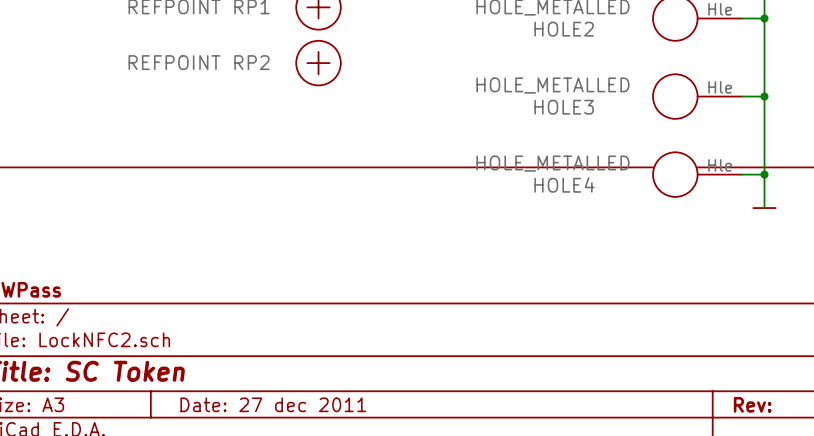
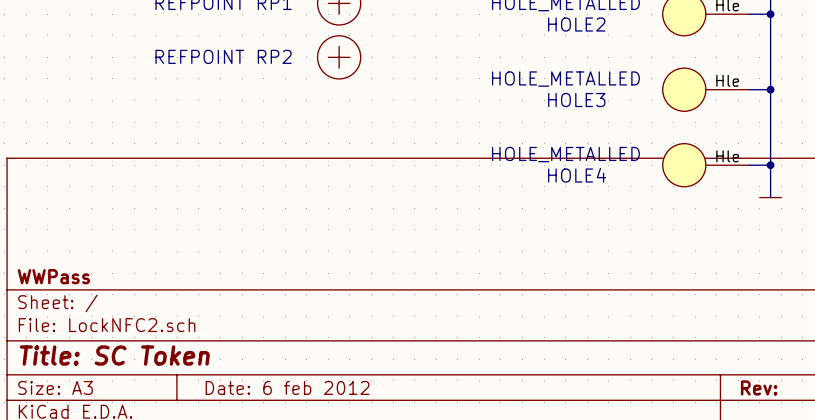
title block: Date: 27 dec 2011 (273, 404) -> Date: 6 feb 2012 (287, 387)

